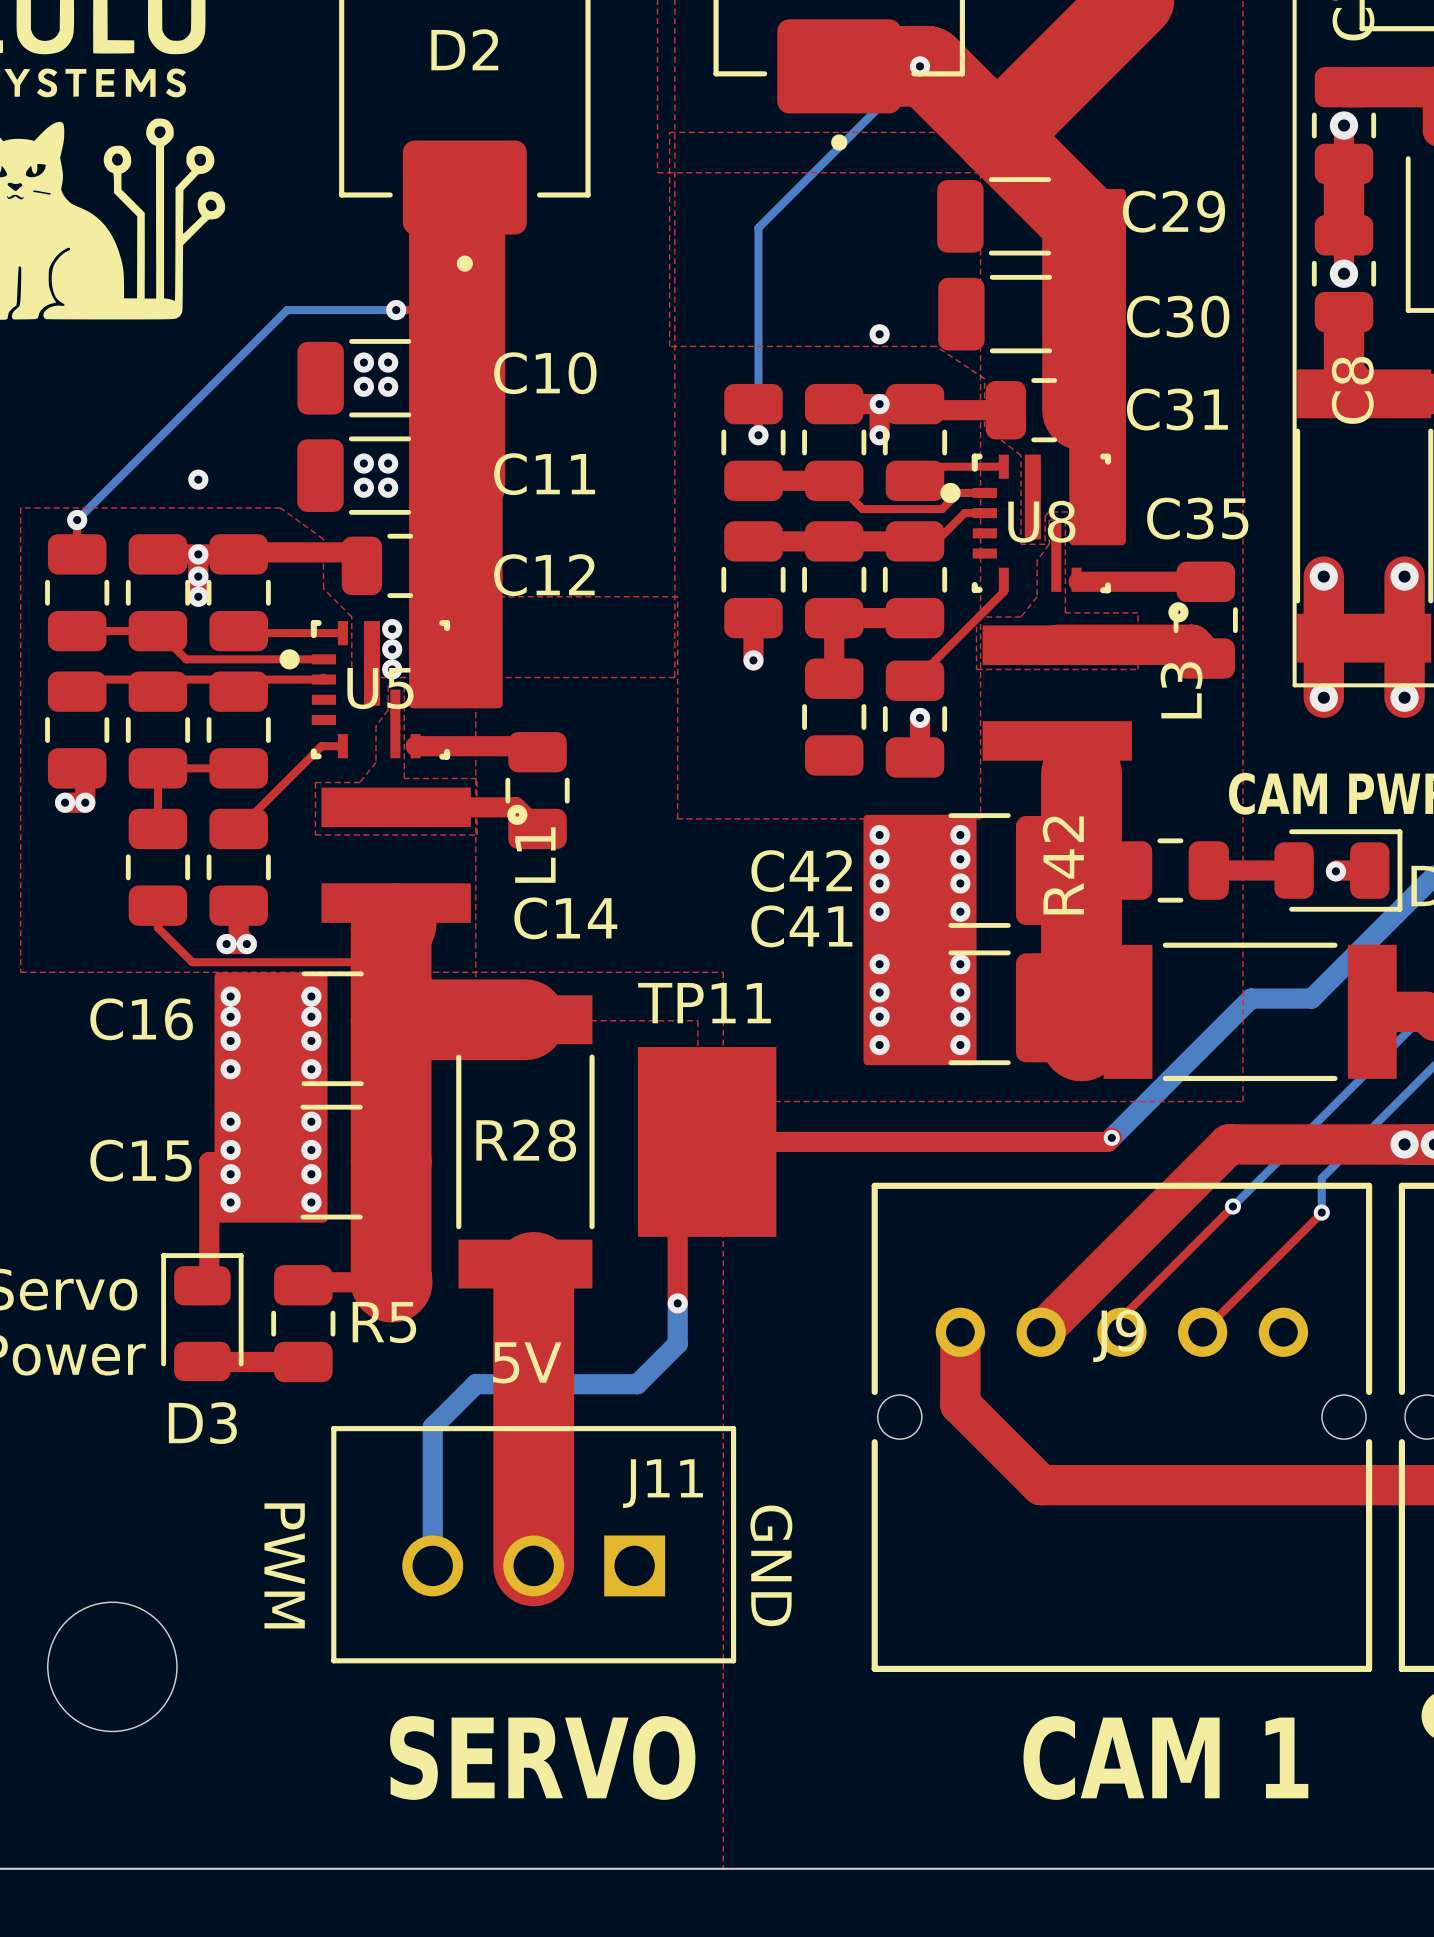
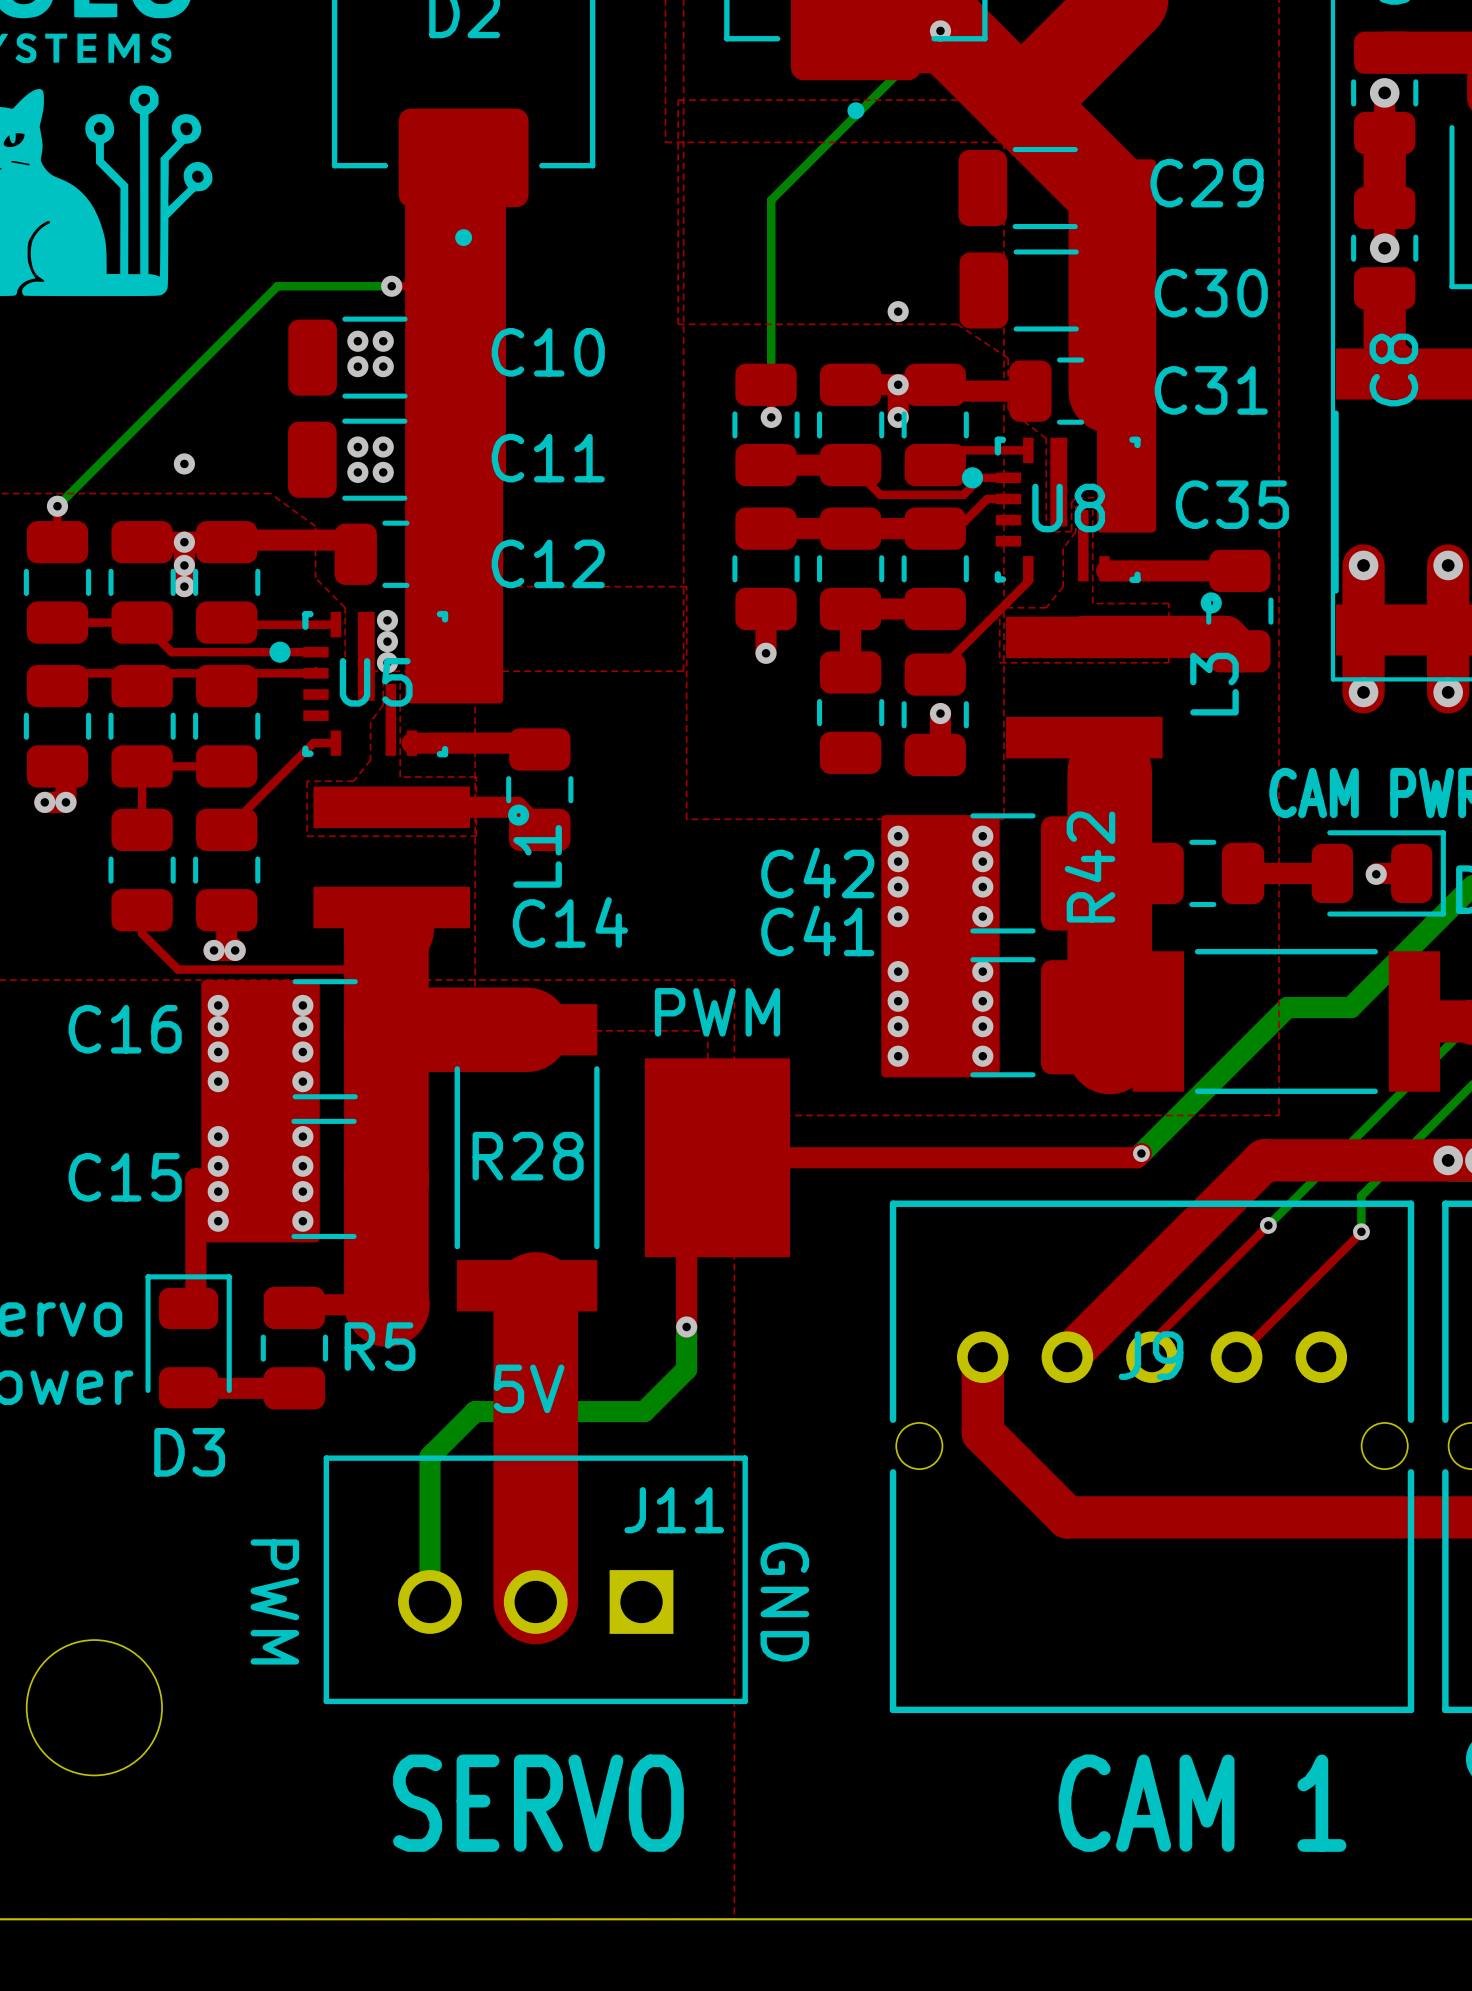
TP11 name: TP11 (704, 1003) -> PWM (717, 1012)

